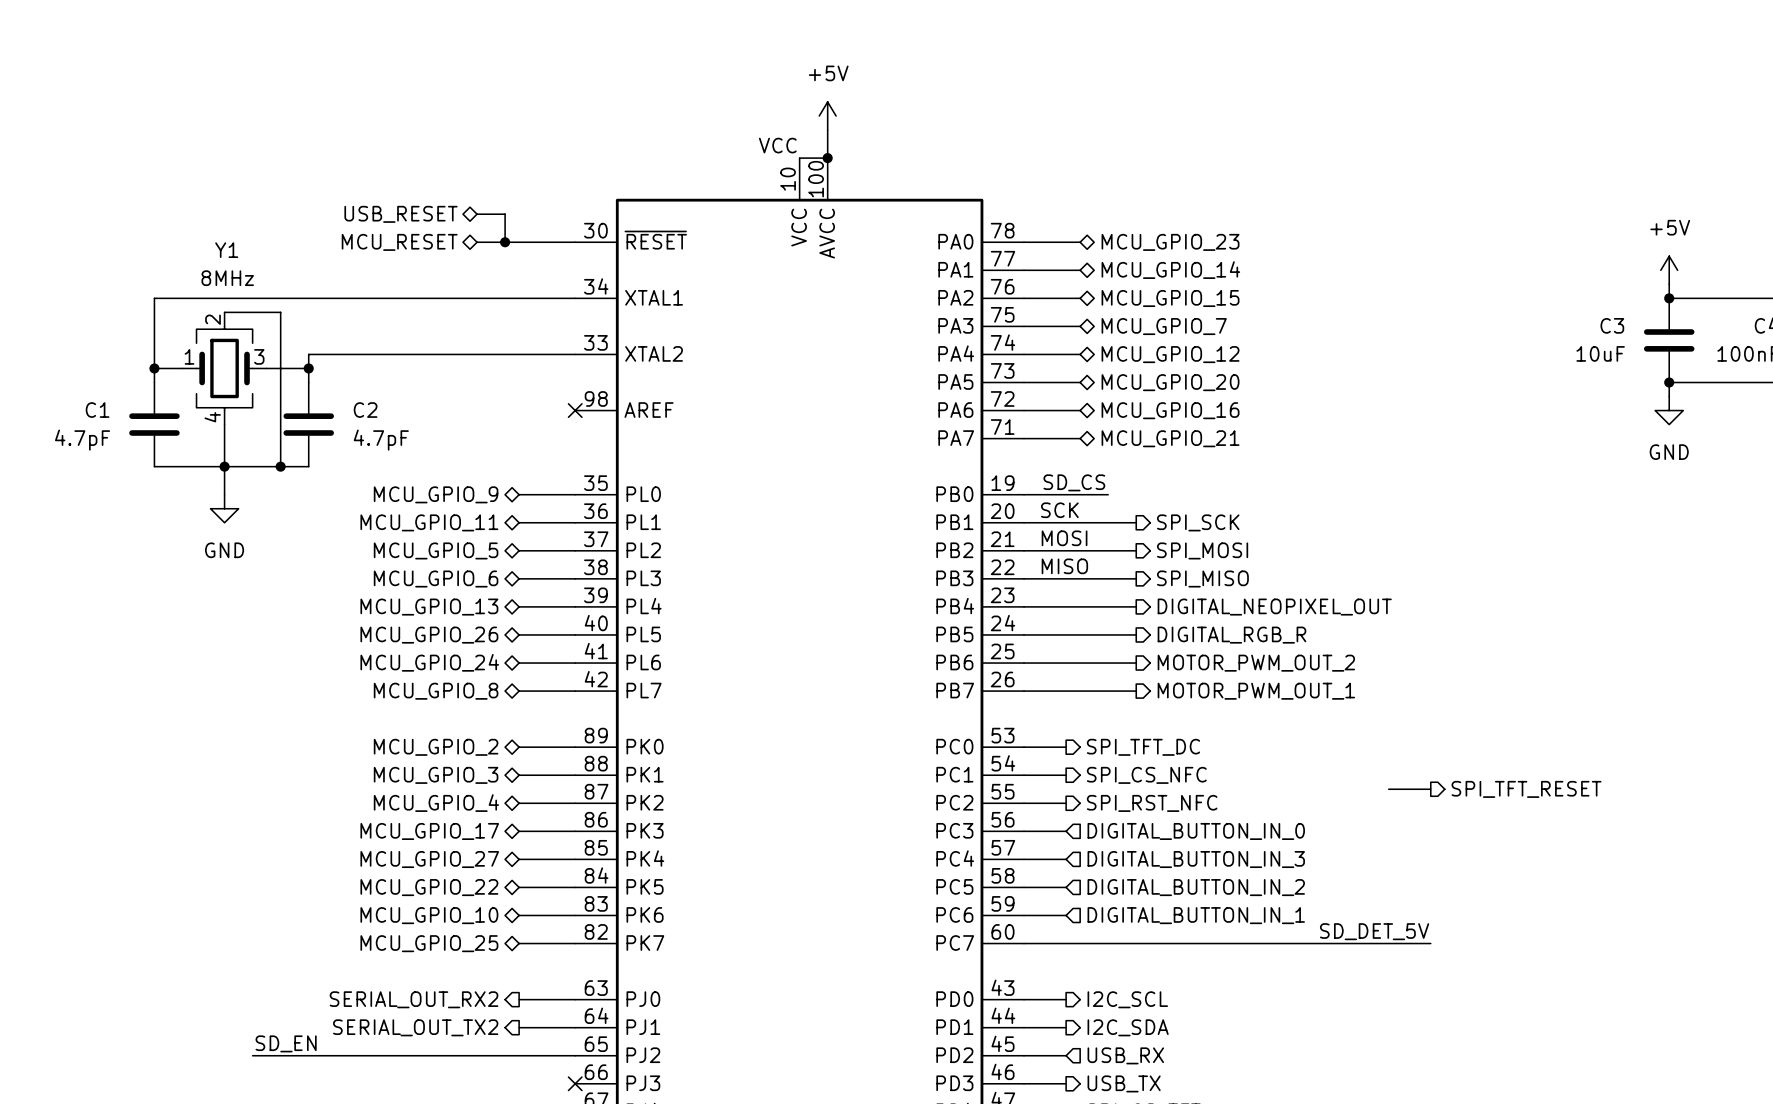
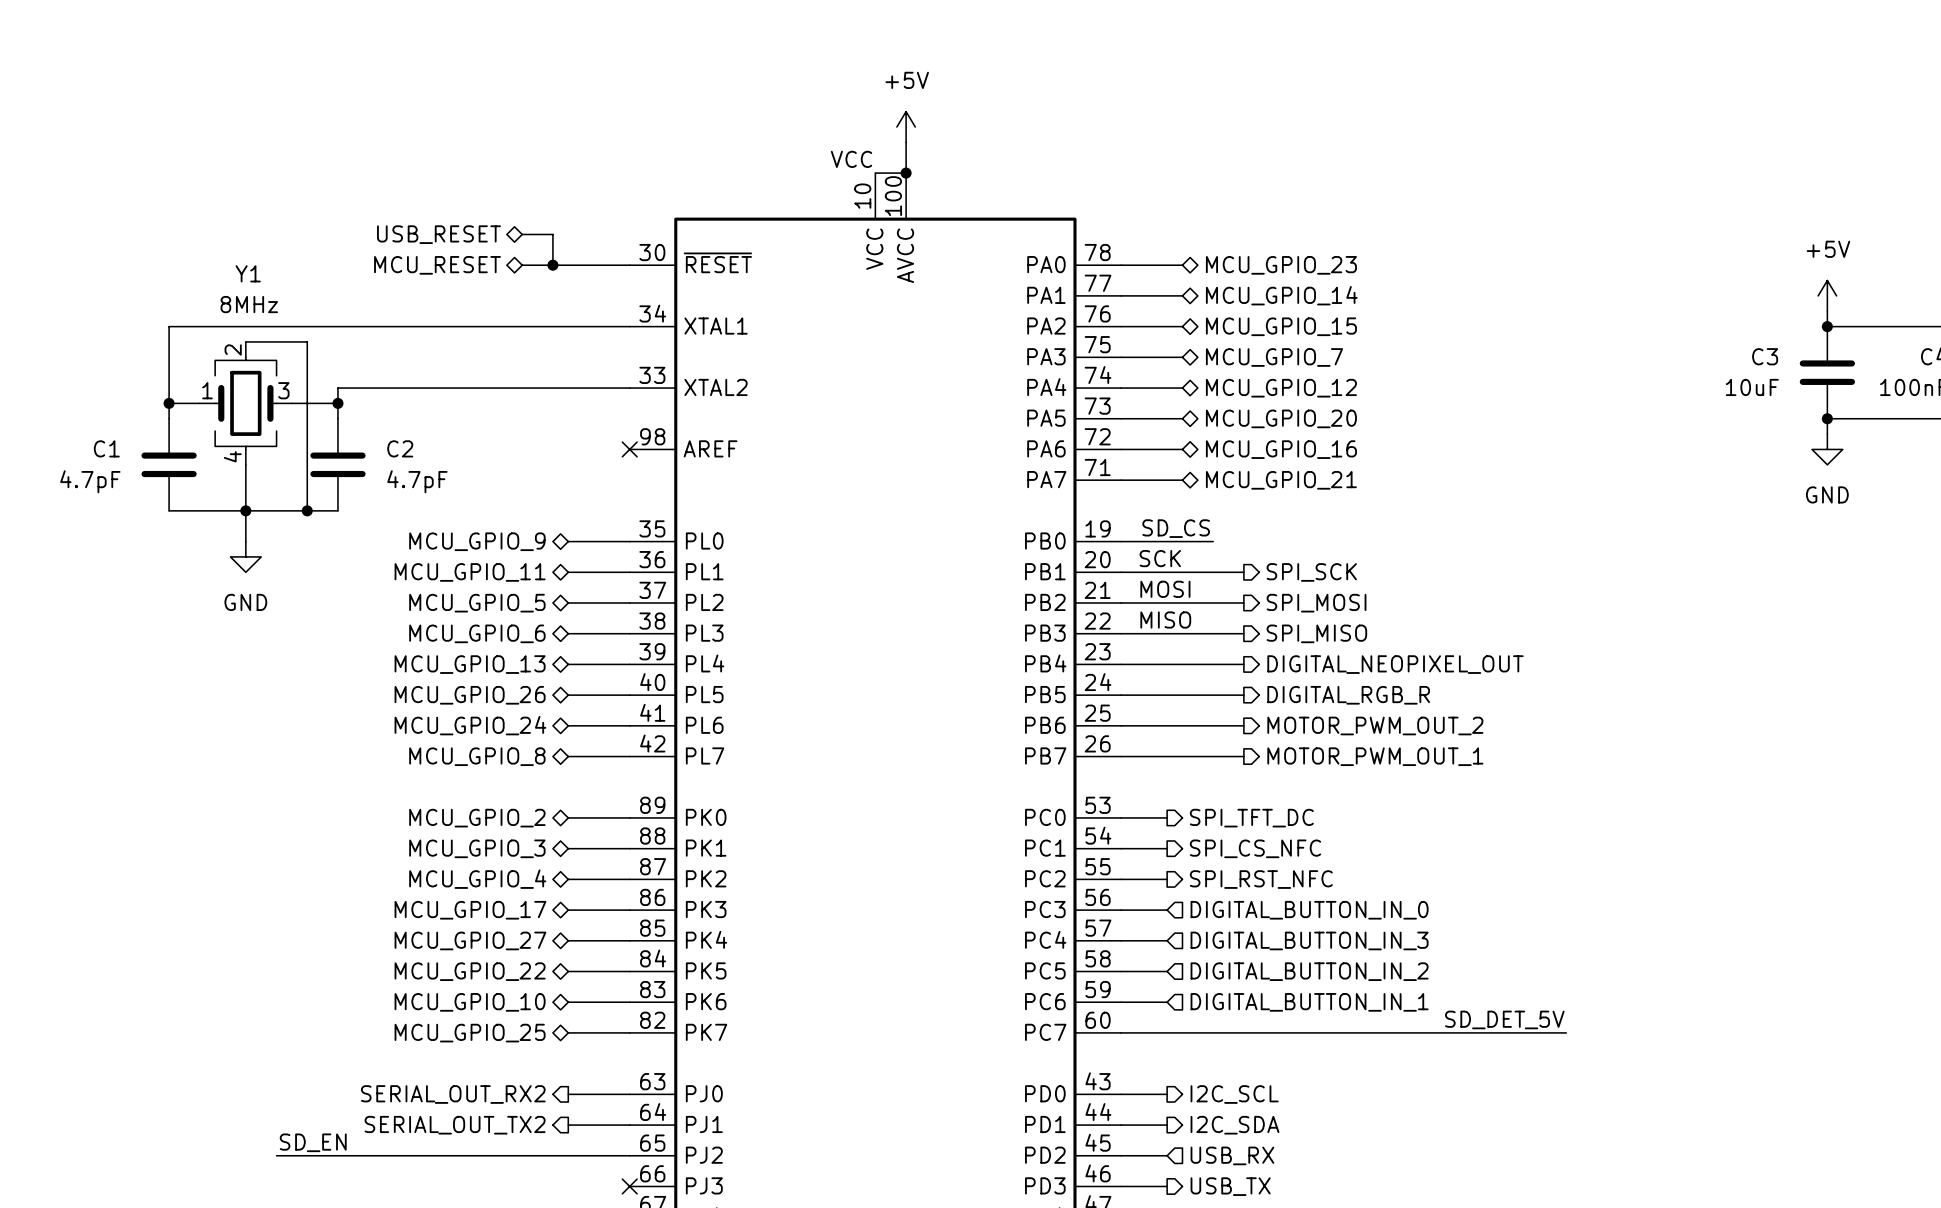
wire: (1388, 789) (1430, 789) -> none
hierarchical label: SPI_TFT_RESET (1526, 789) -> none

